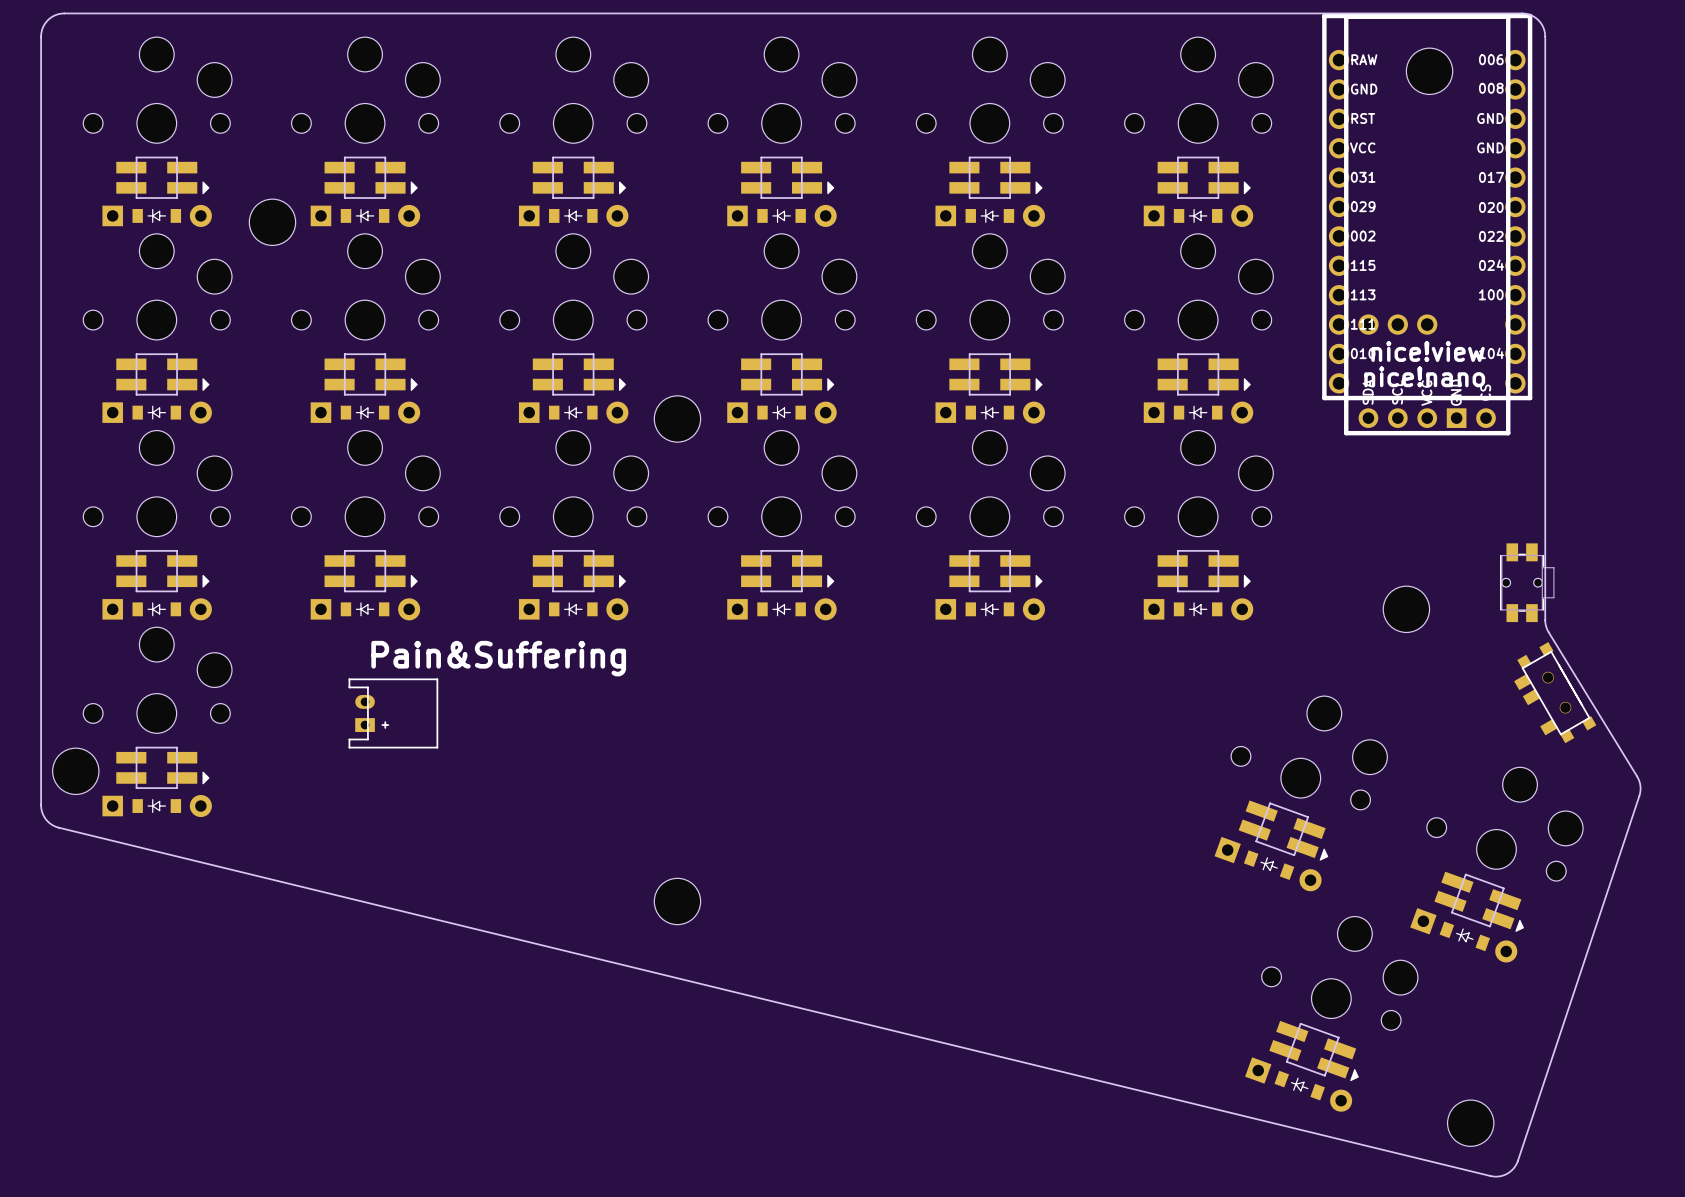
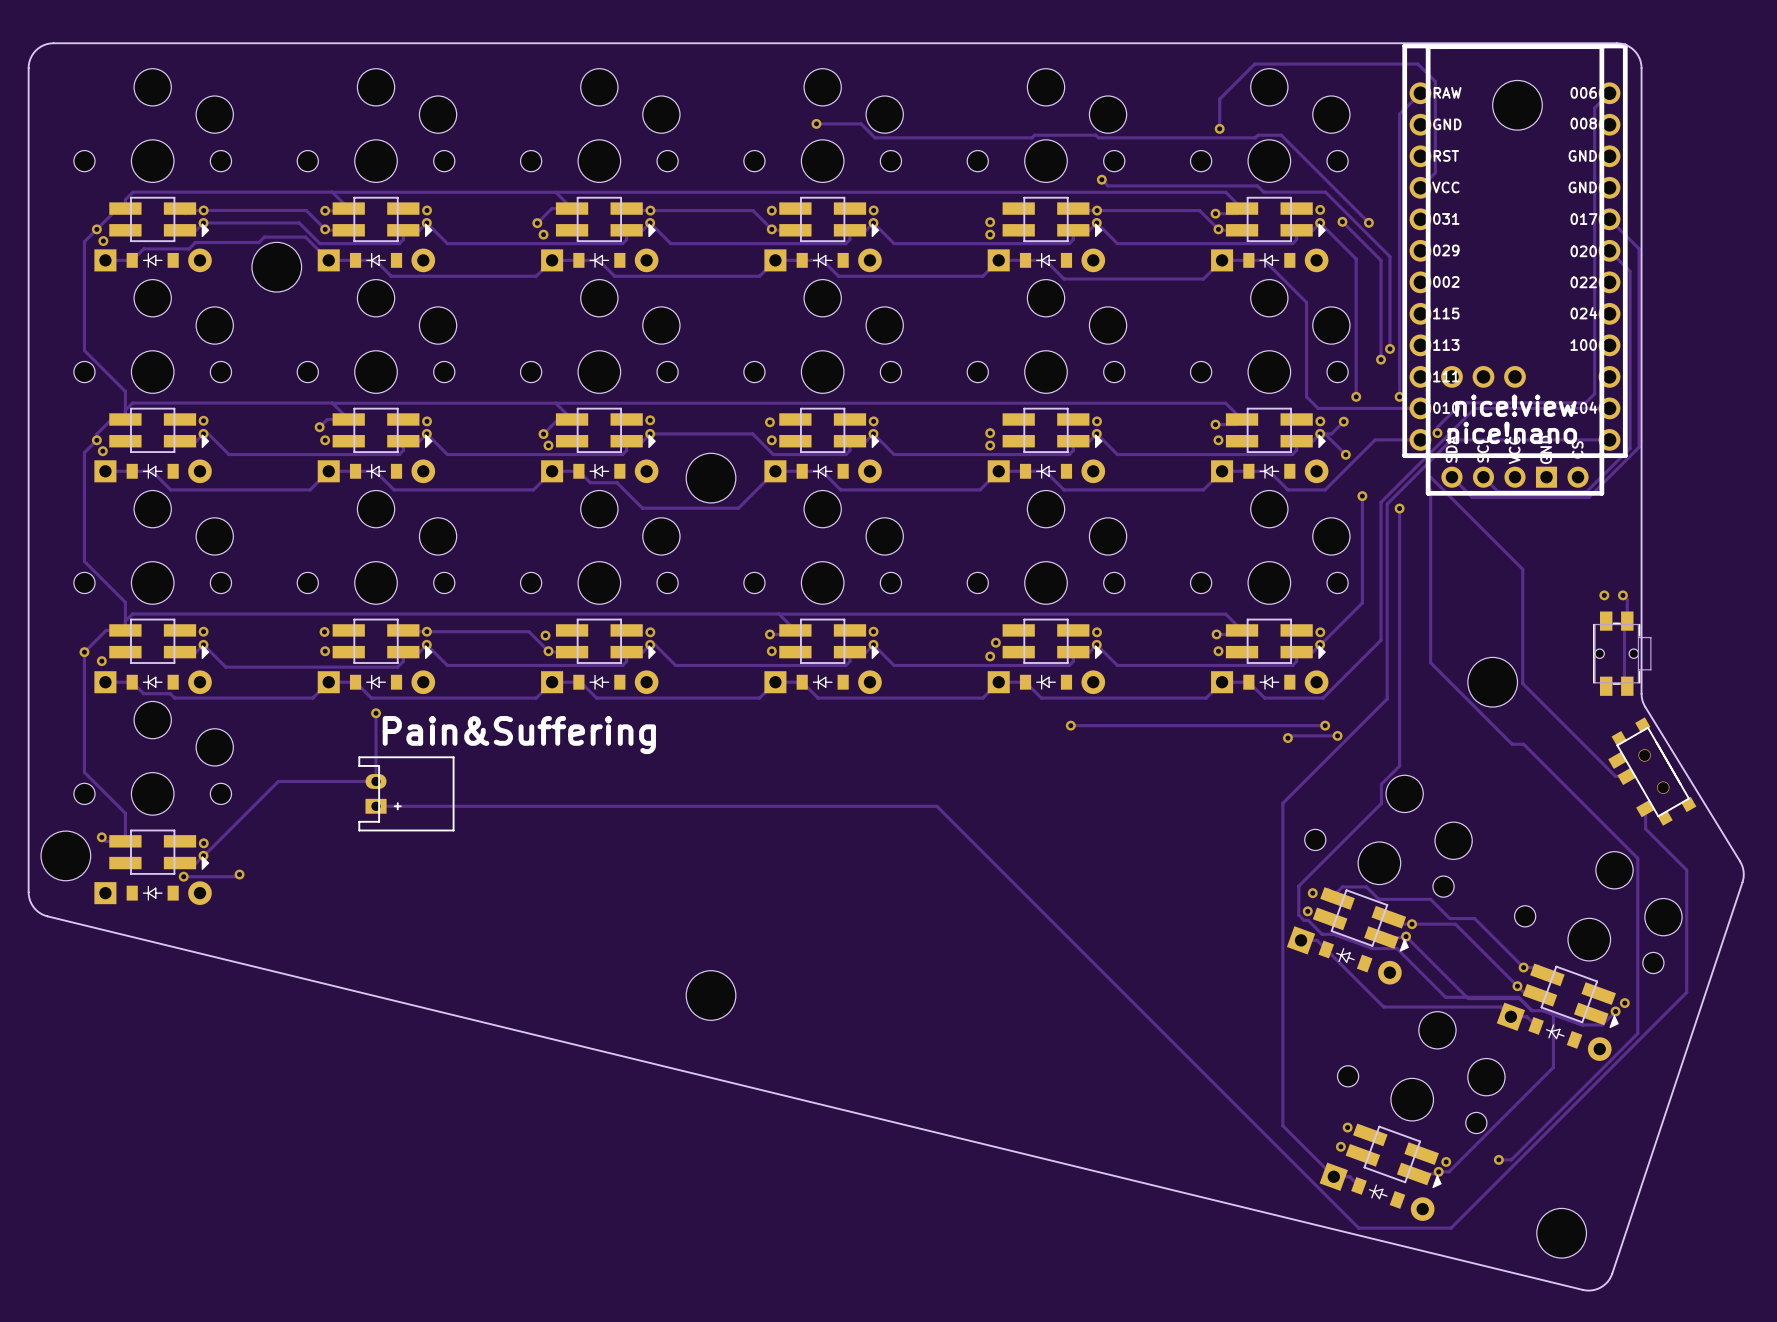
track: none -> (1420, 93) (1399, 114) (1399, 396)
track: none -> (1609, 93) (1594, 108) (1594, 393) (1585, 402) (1461, 402) (1437, 427) (1437, 433)
track: none -> (816, 123) (861, 123) (875, 137) (1032, 137) (1034, 135) (1095, 135) (1098, 137) (1255, 137) (1258, 135) (1281, 135) (1368, 222)
via: none -> (816, 123)
track: none -> (1219, 128) (1219, 99) (1254, 64) (1417, 64) (1435, 81) (1435, 172) (1420, 187)
via: none -> (1219, 128)
track: none -> (1101, 179) (1108, 185) (1257, 185) (1263, 192) (1325, 192) (1390, 256) (1390, 348)
via: none -> (1101, 179)
track: none -> (332, 192) (1225, 192) (1242, 208) (1236, 213) (1215, 213)
track: none -> (555, 192) (572, 208) (551, 208) (537, 223)
track: none -> (125, 208) (125, 199) (133, 192) (332, 192) (348, 208) (346, 210) (325, 210)
track: none -> (125, 208) (117, 208) (84, 241) (84, 350) (125, 391) (125, 419)
track: none -> (626, 208) (628, 210) (753, 210) (772, 230) (795, 230)
track: none -> (1073, 208) (1075, 210) (1199, 210) (1219, 230) (1242, 230)
via: none -> (1320, 209)
track: none -> (181, 210) (306, 210) (326, 230) (348, 230)
via: none -> (203, 210)
via: none -> (325, 210)
via: none -> (427, 210)
via: none -> (650, 210)
via: none -> (771, 210)
via: none -> (873, 210)
via: none -> (1097, 210)
via: none -> (1215, 213)
track: none -> (1609, 219) (1639, 248) (1639, 447) (1588, 497) (1472, 497) (1451, 477)
track: none -> (1342, 221) (1381, 260) (1381, 359)
via: none -> (1342, 221)
via: none -> (990, 222)
via: none -> (1368, 222)
via: none -> (203, 222)
via: none -> (426, 222)
via: none -> (537, 223)
via: none -> (650, 222)
via: none -> (873, 222)
via: none -> (1096, 222)
via: none -> (1320, 222)
via: none -> (96, 229)
track: none -> (180, 230) (196, 230) (203, 222) (299, 222) (319, 243) (399, 243) (403, 239) (403, 230) (419, 230) (426, 222) (447, 243) (622, 243) (626, 239) (626, 230) (642, 230) (650, 222) (670, 243) (845, 243) (849, 239) (849, 230) (866, 230) (873, 222) (894, 243) (1069, 243) (1073, 239) (1073, 230) (1089, 230) (1096, 222) (1117, 243) (1292, 243) (1296, 239) (1296, 230) (1312, 230) (1320, 222) (1356, 259) (1356, 396)
via: none -> (325, 229)
via: none -> (771, 229)
via: none -> (1218, 229)
via: none -> (543, 234)
via: none -> (990, 234)
via: none -> (103, 241)
track: none -> (1609, 250) (1630, 271) (1630, 448) (1586, 491) (1498, 491) (1483, 477)
track: none -> (105, 260) (132, 260) (143, 248) (188, 248) (195, 242) (258, 242) (264, 237) (305, 237) (328, 260) (375, 260) (391, 276) (536, 276) (552, 260) (598, 260) (614, 276) (759, 276) (775, 260) (822, 260) (838, 276) (982, 276) (998, 260) (1045, 260) (1064, 278) (1203, 278) (1222, 260) (1264, 260) (1306, 302) (1306, 396) (1318, 408) (1420, 408)
via: none -> (1390, 348)
via: none -> (1381, 359)
via: none -> (1356, 396)
via: none -> (1399, 396)
track: none -> (332, 403) (1225, 403) (1242, 419) (1236, 424) (1215, 424)
track: none -> (555, 403) (572, 419) (558, 419) (543, 434)
track: none -> (1609, 408) (1474, 408) (1381, 502) (1381, 640) (1323, 698) (1264, 698) (1248, 682) (1222, 682) (1206, 698) (1041, 698) (1025, 682) (998, 682) (982, 698) (818, 698) (802, 682) (775, 682) (759, 698) (596, 698) (580, 682) (552, 682) (536, 698) (371, 698) (355, 682) (328, 682) (312, 698) (174, 698) (170, 693) (143, 693) (132, 682) (105, 682)
track: none -> (125, 410) (132, 403) (332, 403) (348, 419) (327, 419) (319, 427)
track: none -> (125, 419) (111, 419) (96, 434) (96, 440) (84, 452) (84, 561) (125, 602) (125, 630)
via: none -> (203, 420)
via: none -> (650, 420)
via: none -> (427, 421)
via: none -> (769, 422)
via: none -> (873, 421)
via: none -> (1097, 421)
via: none -> (1320, 421)
track: none -> (1343, 421) (1331, 433) (1320, 433) (1312, 441) (1296, 441) (1296, 450) (1292, 454) (1117, 454) (1096, 433) (1089, 441) (1073, 441) (1073, 450) (1069, 454) (894, 454) (873, 433) (866, 441) (849, 441) (849, 450) (845, 454) (773, 454) (752, 433) (650, 433) (642, 441) (626, 441) (626, 450) (622, 454) (447, 454) (426, 433) (419, 441) (403, 441) (403, 450) (399, 454) (229, 454) (208, 433) (203, 433) (196, 441) (180, 441)
via: none -> (1343, 421)
via: none -> (1215, 424)
via: none -> (319, 427)
via: none -> (203, 433)
via: none -> (426, 433)
via: none -> (543, 434)
via: none -> (650, 433)
via: none -> (873, 433)
via: none -> (990, 433)
via: none -> (1096, 433)
via: none -> (1320, 433)
track: none -> (1325, 433) (1345, 454)
via: none -> (1437, 433)
via: none -> (96, 440)
via: none -> (325, 440)
via: none -> (771, 440)
via: none -> (1218, 440)
track: none -> (1420, 439) (1375, 439) (1325, 489) (1287, 489) (1269, 471) (1222, 471) (1203, 489) (1064, 489) (1045, 471) (998, 471) (980, 489) (840, 489) (822, 471) (775, 471) (738, 508) (642, 508) (617, 482) (590, 482) (578, 471) (552, 471) (533, 489) (394, 489) (375, 471) (328, 471) (310, 489) (170, 489) (152, 471) (105, 471)
track: none -> (1609, 439) (1451, 439) (1387, 504) (1387, 698) (1282, 803) (1282, 1125) (1333, 1176) (1349, 1176) (1359, 1185)
via: none -> (548, 445)
via: none -> (990, 445)
via: none -> (102, 451)
via: none -> (1345, 454)
track: none -> (1427, 477) (1430, 477) (1522, 569) (1522, 683) (1615, 776) (1627, 776)
track: none -> (1430, 489) (1430, 662) (1512, 744) (1523, 744) (1637, 858) (1637, 1033) (1511, 1159) (1498, 1159)
track: none -> (1362, 496) (1362, 602) (1312, 652) (1296, 652) (1296, 661) (1292, 665) (1117, 665) (1096, 644) (1089, 652) (1073, 652) (1073, 661) (1069, 665) (894, 665) (873, 644) (866, 652) (849, 652) (849, 661) (845, 665) (675, 665) (655, 644) (650, 644) (642, 652) (626, 652) (626, 661) (622, 665) (447, 665) (426, 644) (419, 652) (403, 652) (403, 661) (397, 667) (225, 667) (203, 644) (196, 652) (180, 652)
via: none -> (1362, 496)
track: none -> (1399, 508) (1399, 766) (1381, 784) (1381, 803) (1298, 886) (1298, 915) (1304, 920) (1308, 920) (1322, 934) (1333, 934) (1372, 948) (1396, 948) (1445, 997) (1518, 997) (1532, 1010) (1543, 1010) (1582, 1024) (1602, 1024) (1615, 1011)
via: none -> (1399, 508)
via: none -> (1604, 595)
track: none -> (1622, 595) (1627, 599) (1627, 621) (1624, 623) (1624, 683) (1627, 686)
via: none -> (1622, 595)
track: none -> (779, 614) (1225, 614) (1242, 630) (1238, 634) (1216, 634)
track: none -> (125, 621) (132, 613) (778, 613) (795, 630) (791, 634) (769, 634)
track: none -> (125, 630) (106, 630) (84, 652) (84, 772) (125, 813) (125, 841) (105, 841) (101, 837)
track: none -> (403, 630) (528, 631) (549, 652) (572, 652)
via: none -> (203, 631)
via: none -> (324, 631)
via: none -> (426, 631)
via: none -> (650, 632)
via: none -> (873, 631)
via: none -> (1097, 632)
via: none -> (1320, 632)
via: none -> (769, 634)
via: none -> (1216, 634)
via: none -> (545, 635)
via: none -> (995, 642)
via: none -> (203, 644)
via: none -> (426, 644)
via: none -> (650, 644)
via: none -> (873, 644)
via: none -> (1096, 644)
via: none -> (1320, 644)
via: none -> (325, 651)
via: none -> (548, 651)
via: none -> (771, 651)
via: none -> (1218, 651)
via: none -> (84, 652)
via: none -> (990, 656)
via: none -> (101, 661)
track: none -> (376, 713) (376, 781) (278, 781) (196, 863) (180, 863)
via: none -> (376, 713)
track: none -> (1070, 725) (1325, 725)
via: none -> (1070, 725)
via: none -> (1325, 725)
track: none -> (1337, 735) (1290, 735) (1287, 738)
via: none -> (1337, 735)
via: none -> (1287, 738)
track: none -> (376, 806) (936, 806) (1358, 1228) (1451, 1228) (1686, 992) (1686, 870) (1645, 828) (1645, 808)
via: none -> (101, 837)
via: none -> (203, 843)
via: none -> (203, 855)
track: none -> (239, 874) (237, 876) (183, 876)
via: none -> (239, 874)
via: none -> (183, 876)
track: none -> (1328, 889) (1337, 898) (1337, 891) (1342, 886) (1366, 886) (1378, 899) (1430, 899) (1449, 918) (1474, 918) (1523, 967) (1540, 967)
via: none -> (1312, 893)
via: none -> (1307, 911)
track: none -> (1388, 917) (1395, 924) (1455, 924) (1526, 995) (1539, 995)
via: none -> (1412, 924)
via: none -> (1406, 936)
track: none -> (1381, 937) (1406, 936) (1468, 998) (1519, 998)
track: none -> (1301, 940) (1317, 940) (1383, 1007) (1501, 1007) (1510, 1016) (1526, 1016) (1536, 1025)
via: none -> (1523, 967)
via: none -> (1517, 986)
via: none -> (1624, 1003)
via: none -> (1615, 1011)
track: none -> (1553, 1014) (1553, 1067) (1449, 1171) (1414, 1173)
via: none -> (1347, 1127)
via: none -> (1340, 1146)
via: none -> (1498, 1159)
via: none -> (1446, 1161)
via: none -> (1438, 1171)

